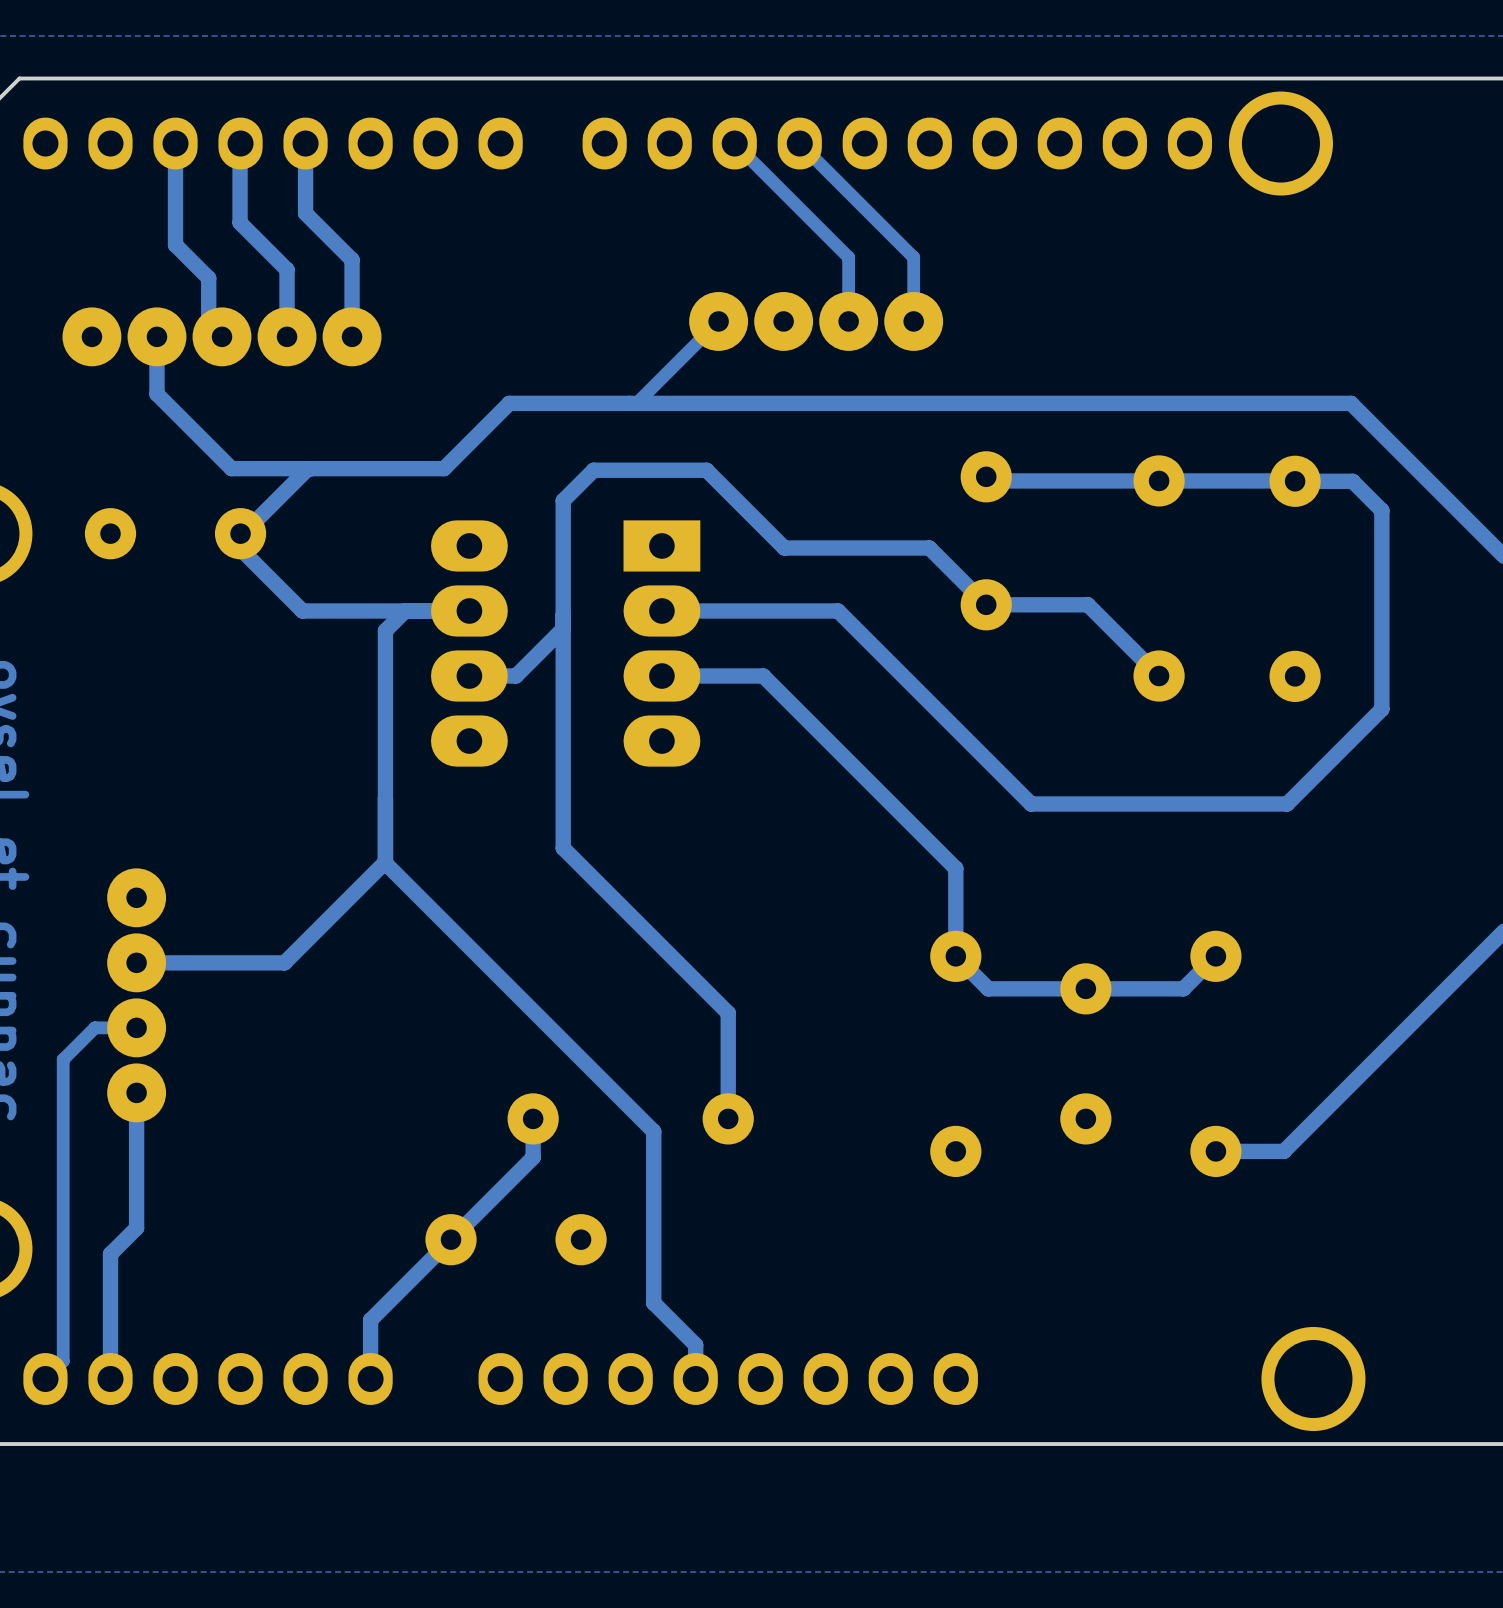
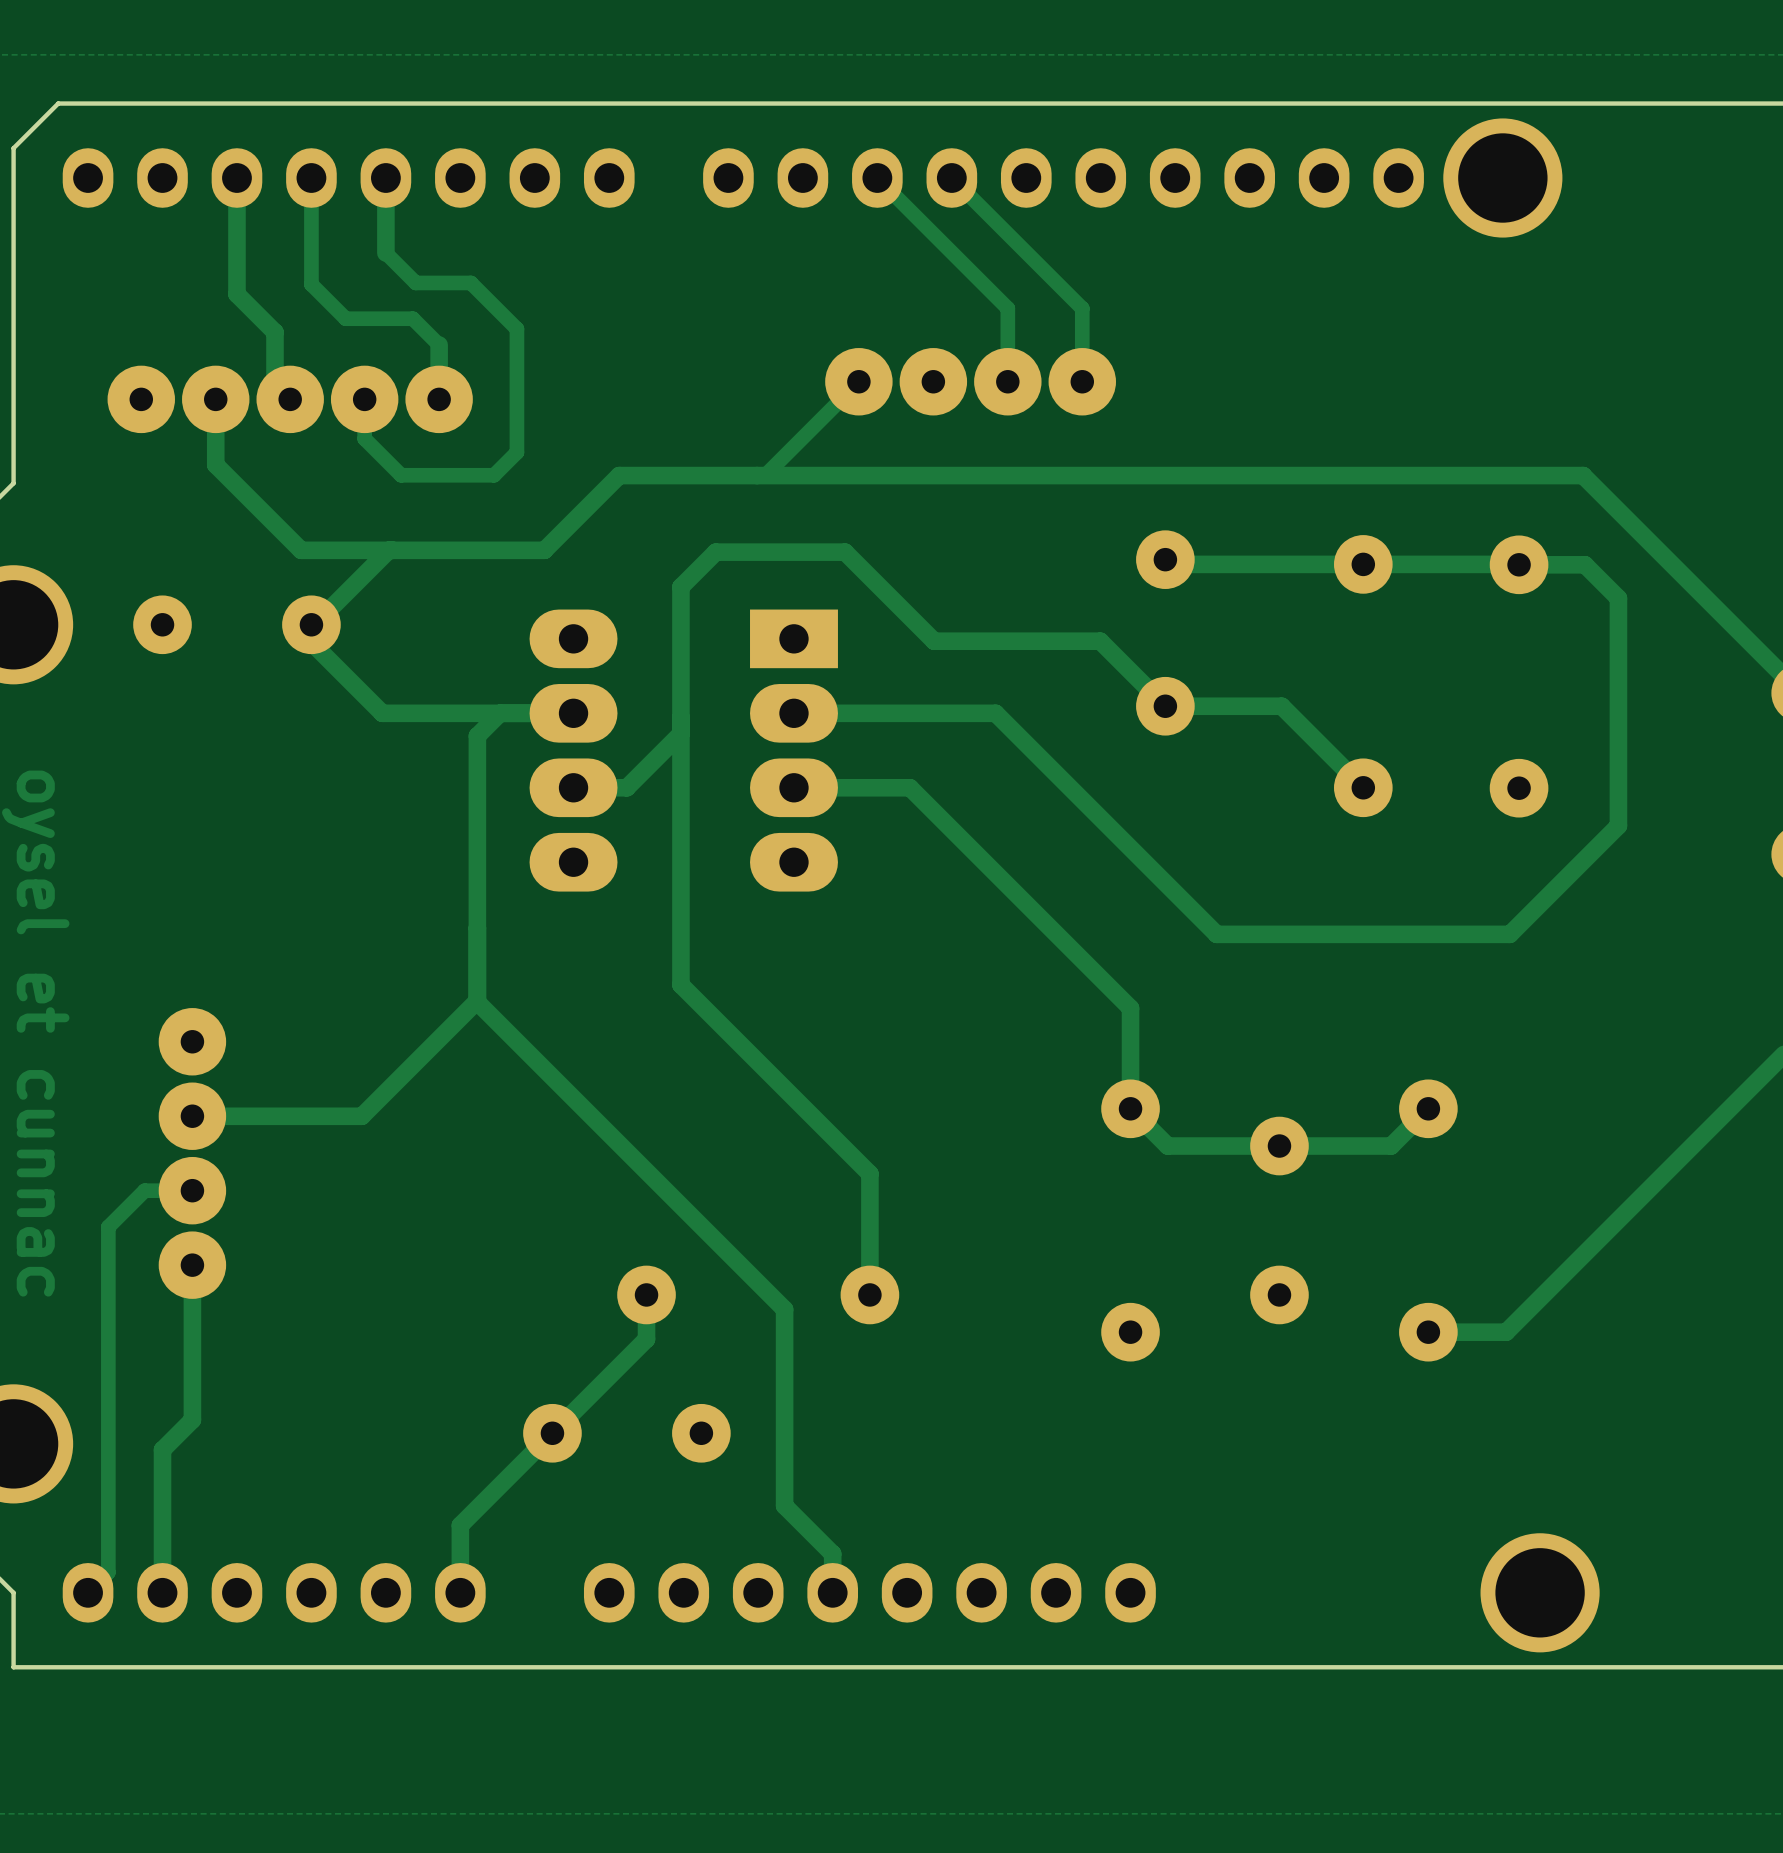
track: (240, 144) (240, 222) (287, 269) (287, 336) -> (311, 178) (311, 284) (345, 318) (412, 318) (439, 344)
track: (305, 209) (305, 213) (352, 259) (352, 289) -> (385, 253) (415, 282) (470, 282) (516, 328) (516, 452) (494, 475) (401, 475) (364, 438) (364, 399)

